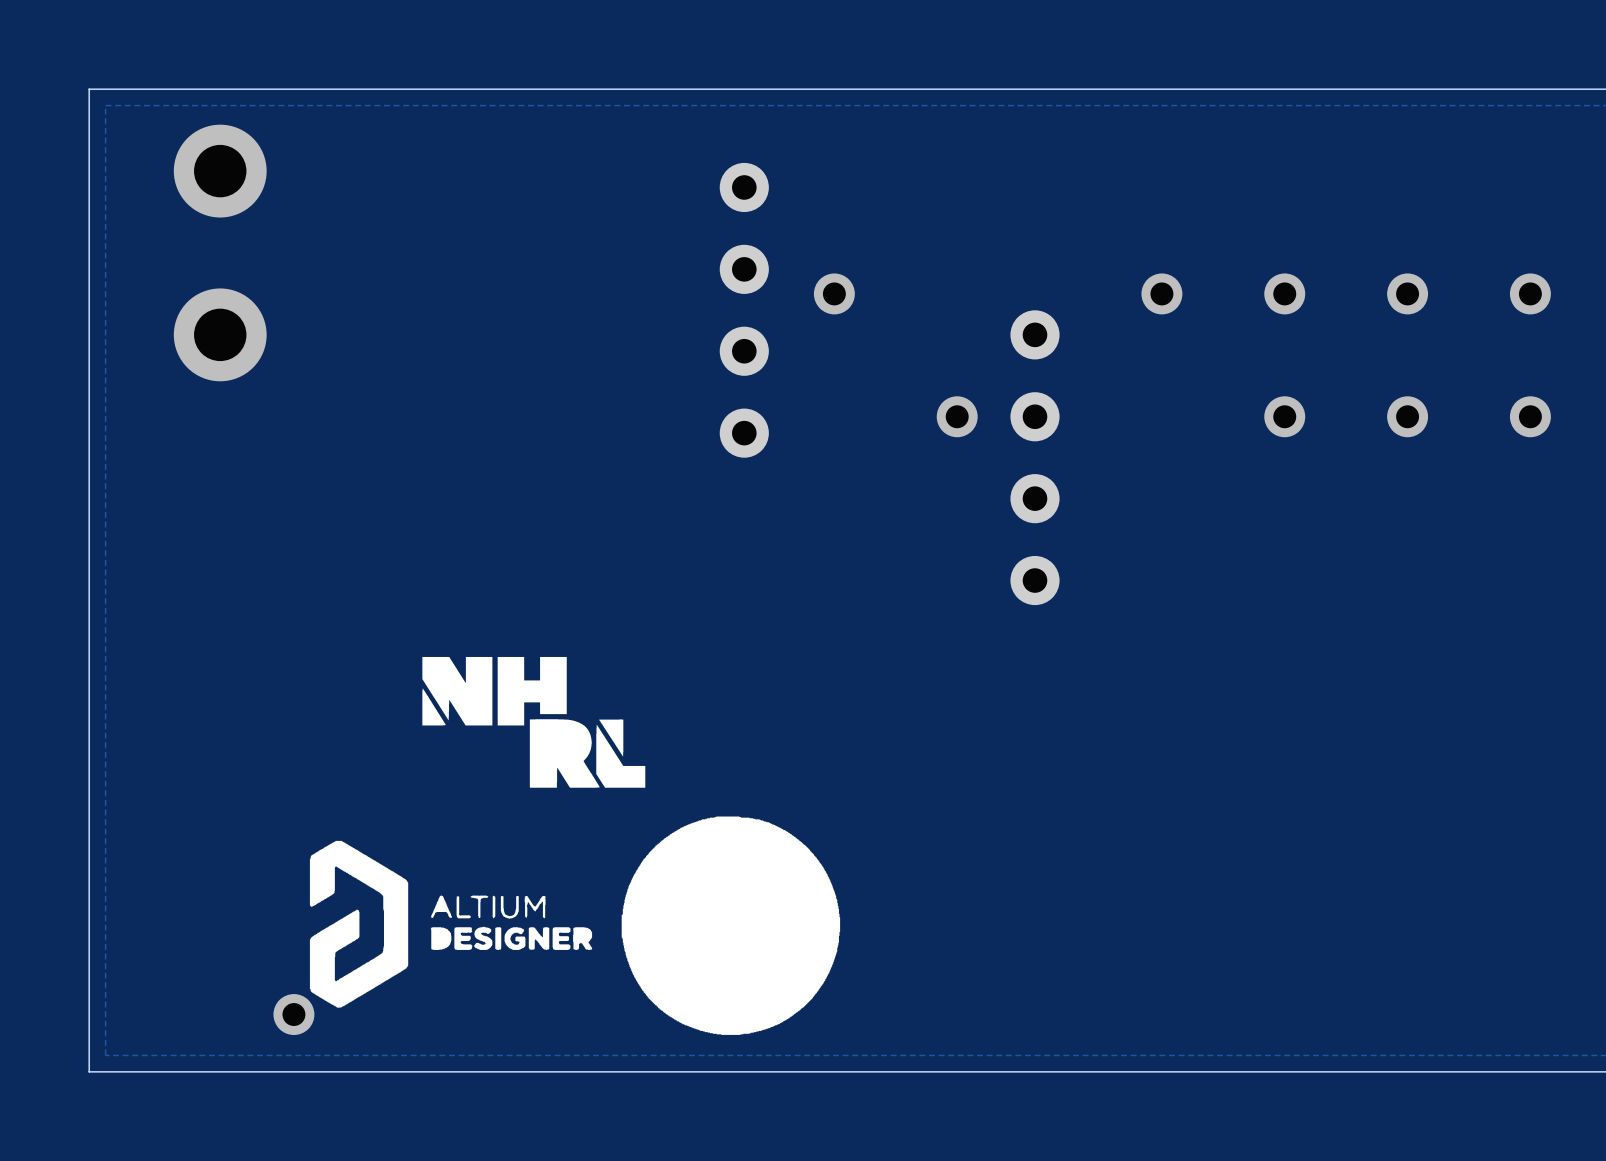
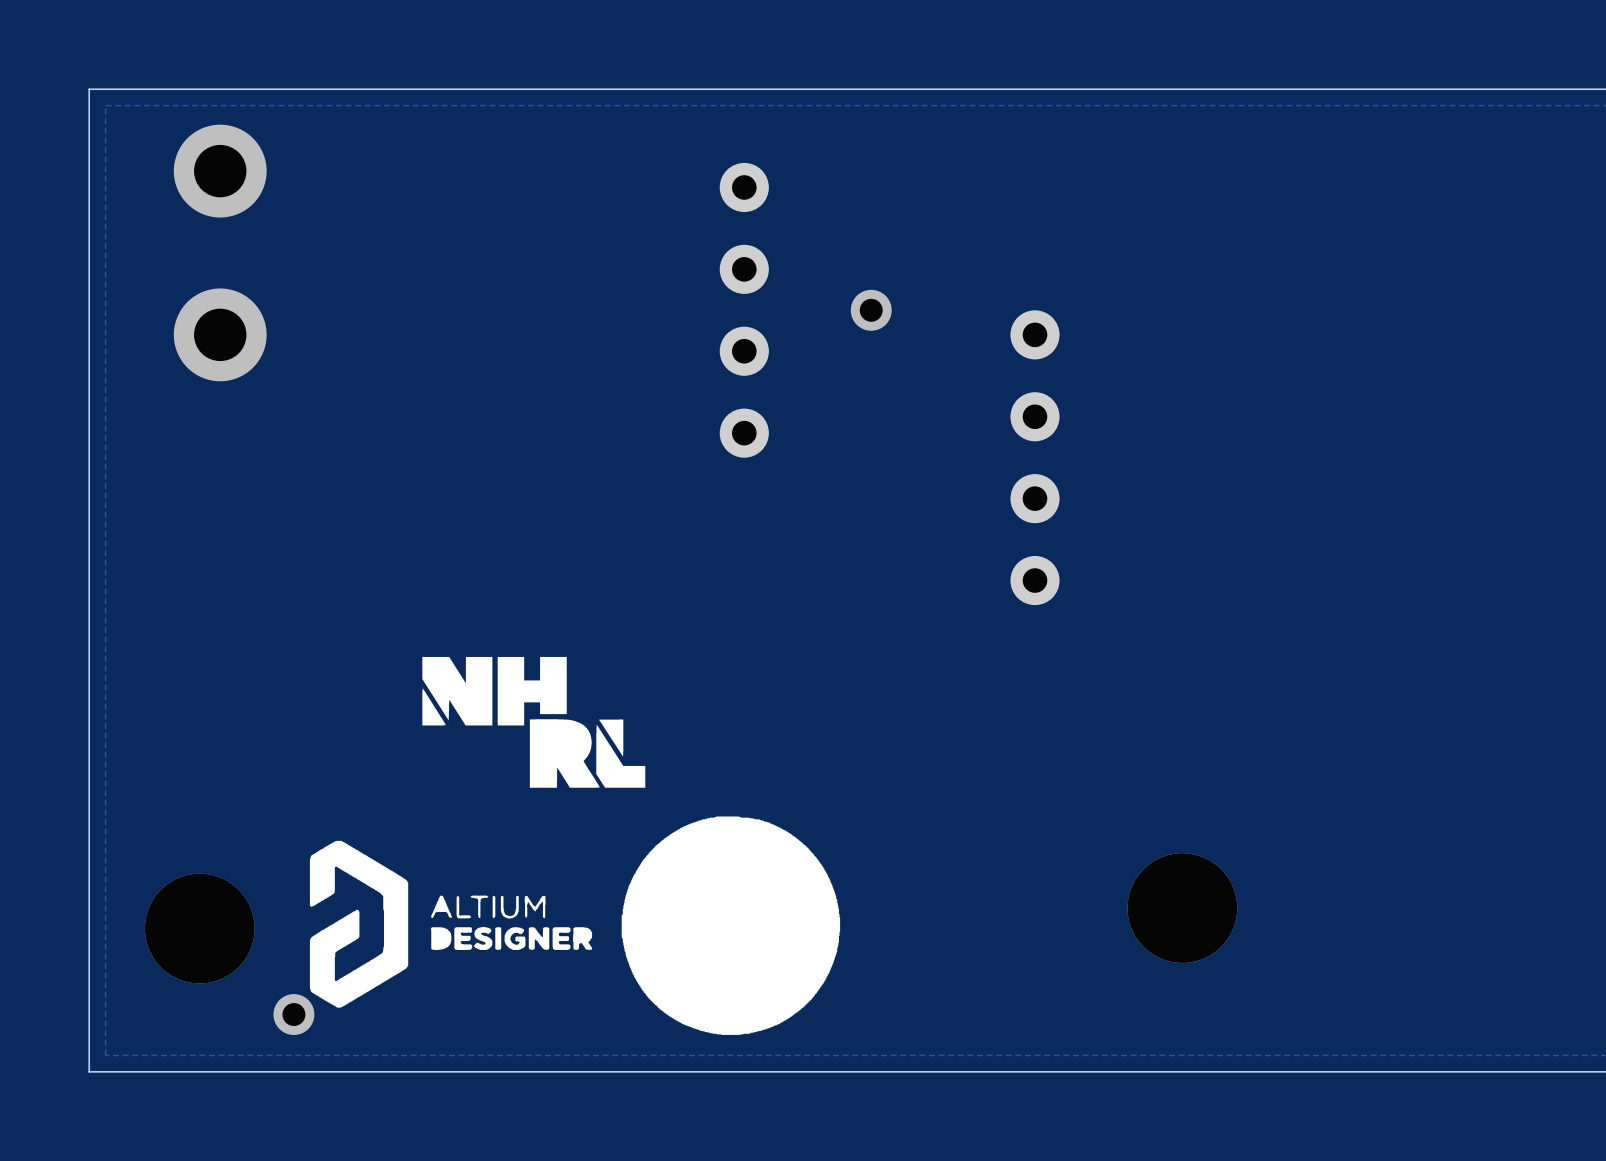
via position: (834, 293) -> (871, 310)
via: (1161, 293) -> none
via: (1284, 293) -> none
via: (1407, 293) -> none
via: (1530, 293) -> none
via: (957, 416) -> none
via: (1284, 416) -> none
via: (1407, 416) -> none
via: (1530, 416) -> none
via: none -> (1182, 908)
via: none -> (199, 928)

